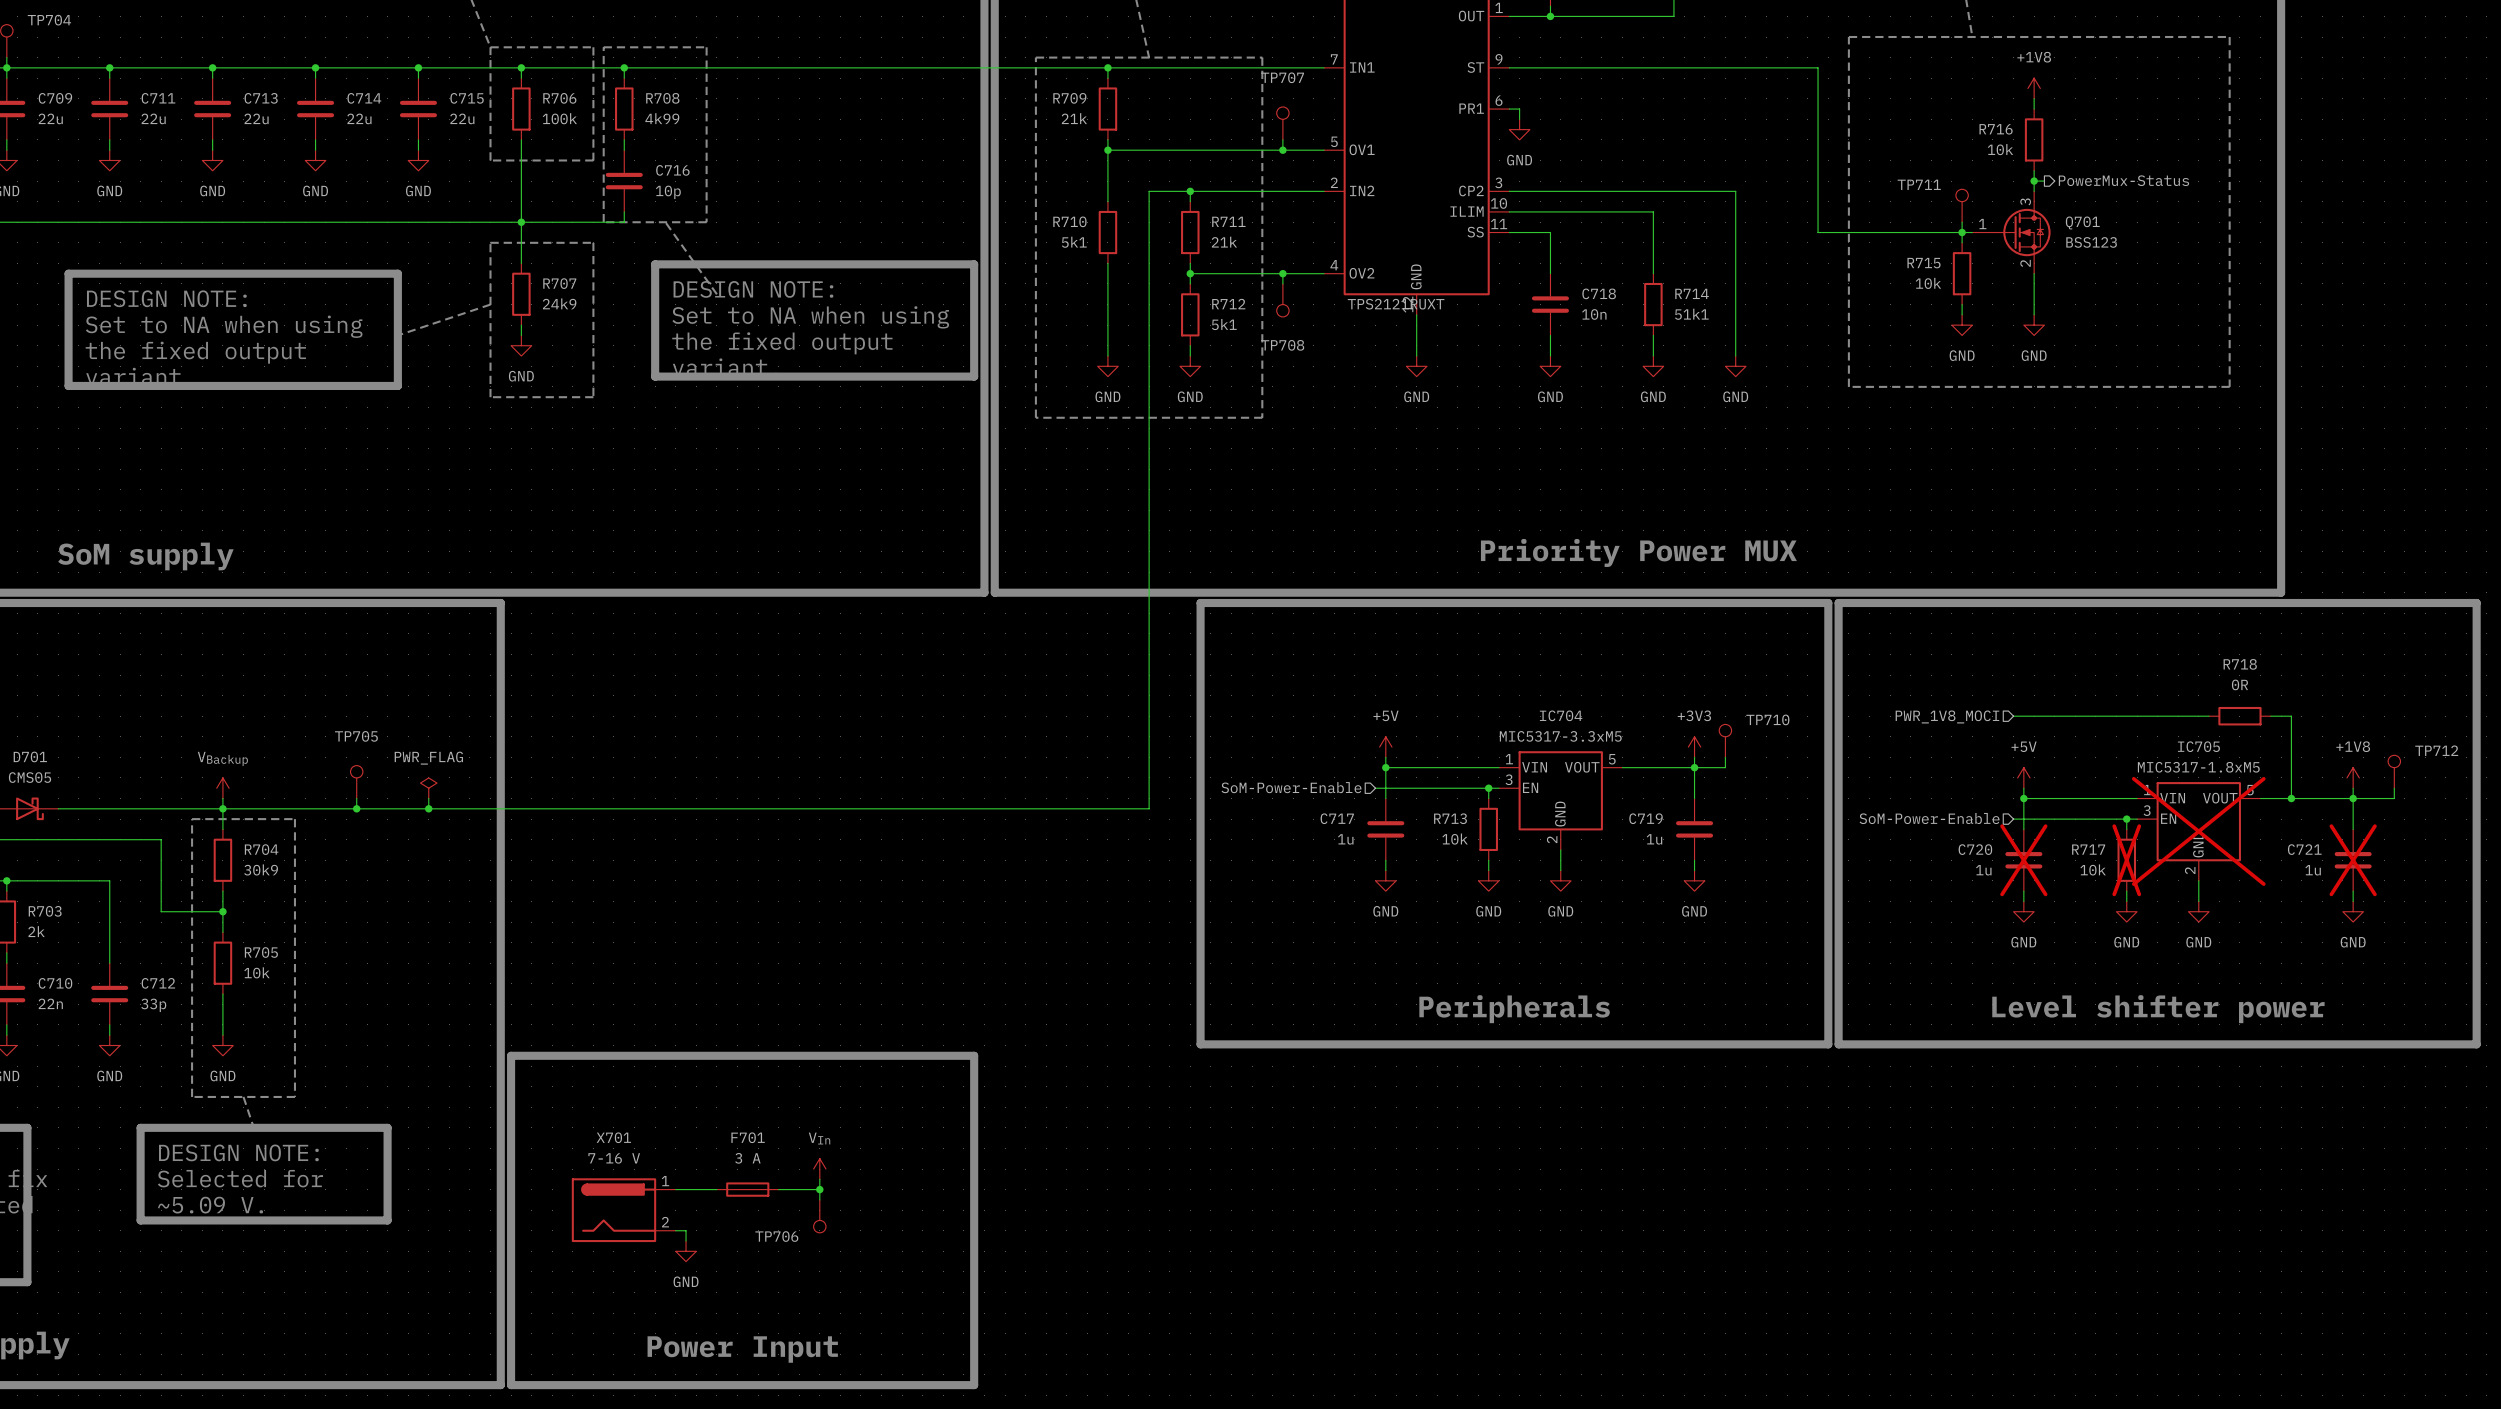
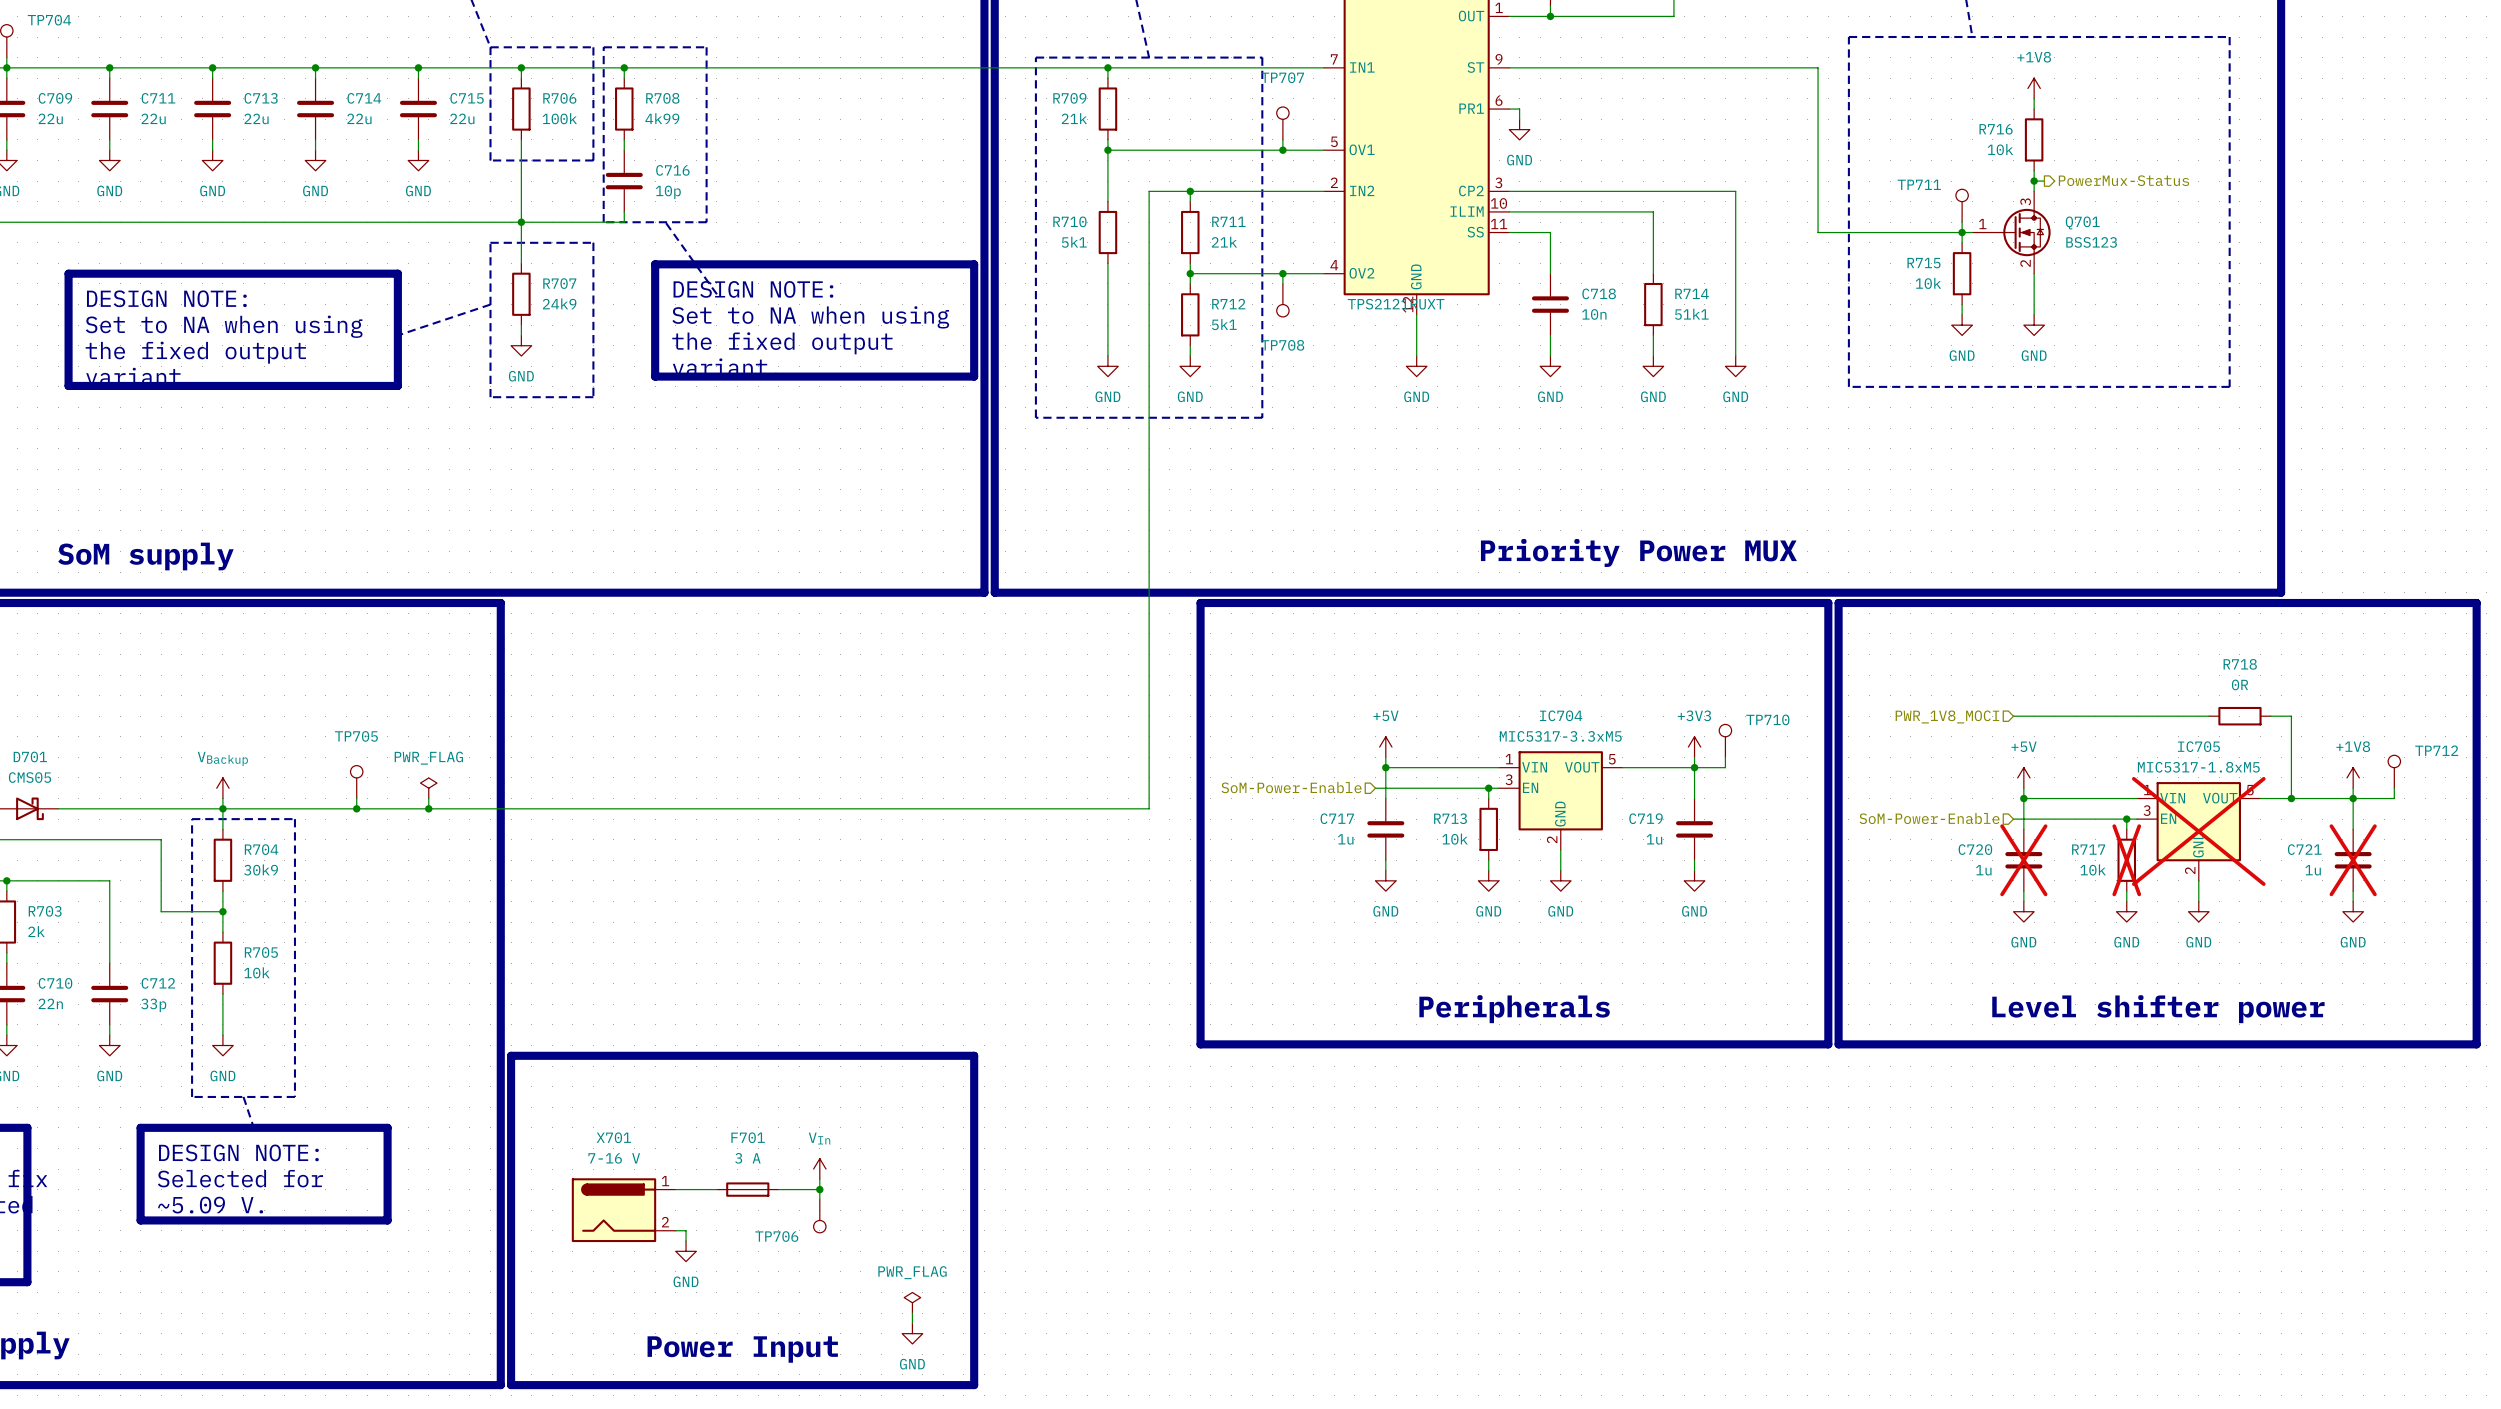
power symbol: none -> PWR_FLAG (912, 1302)
wire: none -> (912, 1313) (912, 1323)
power symbol: none -> GND (912, 1333)

